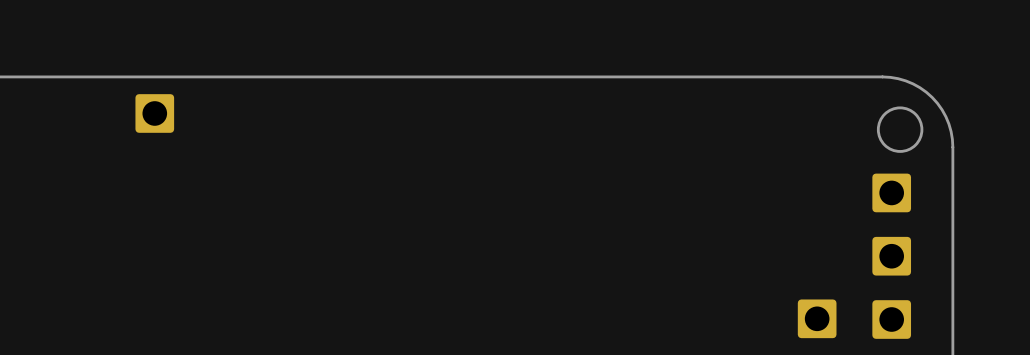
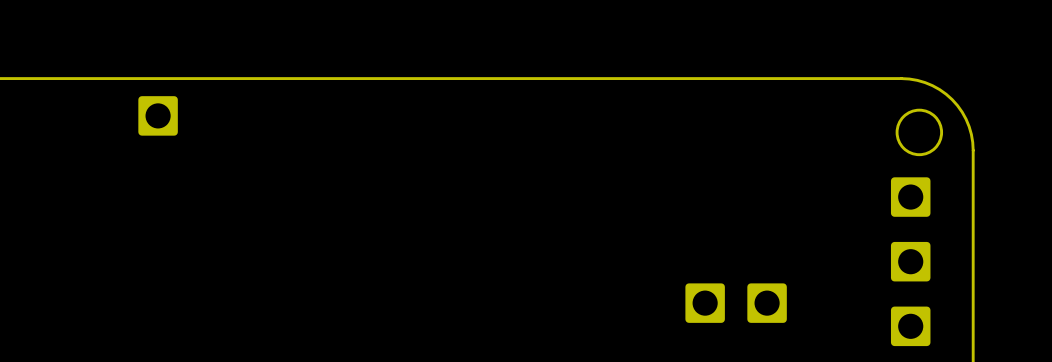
part: none -> (705, 303)
part: none -> (767, 303)
part: (817, 318) -> none

